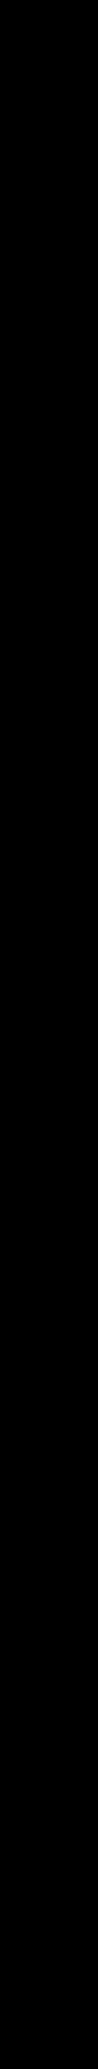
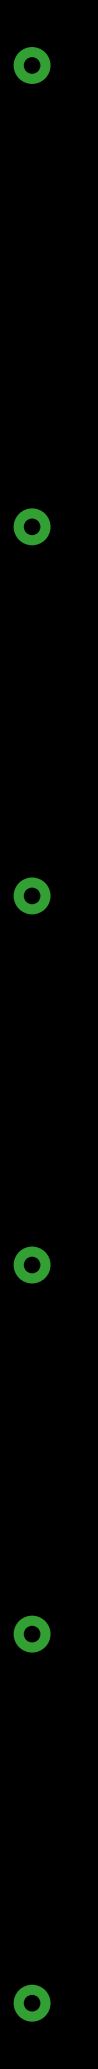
part: none -> (32, 65)
part: none -> (32, 526)
part: none -> (32, 895)
part: none -> (32, 1265)
part: none -> (32, 1634)
part: none -> (32, 2003)

